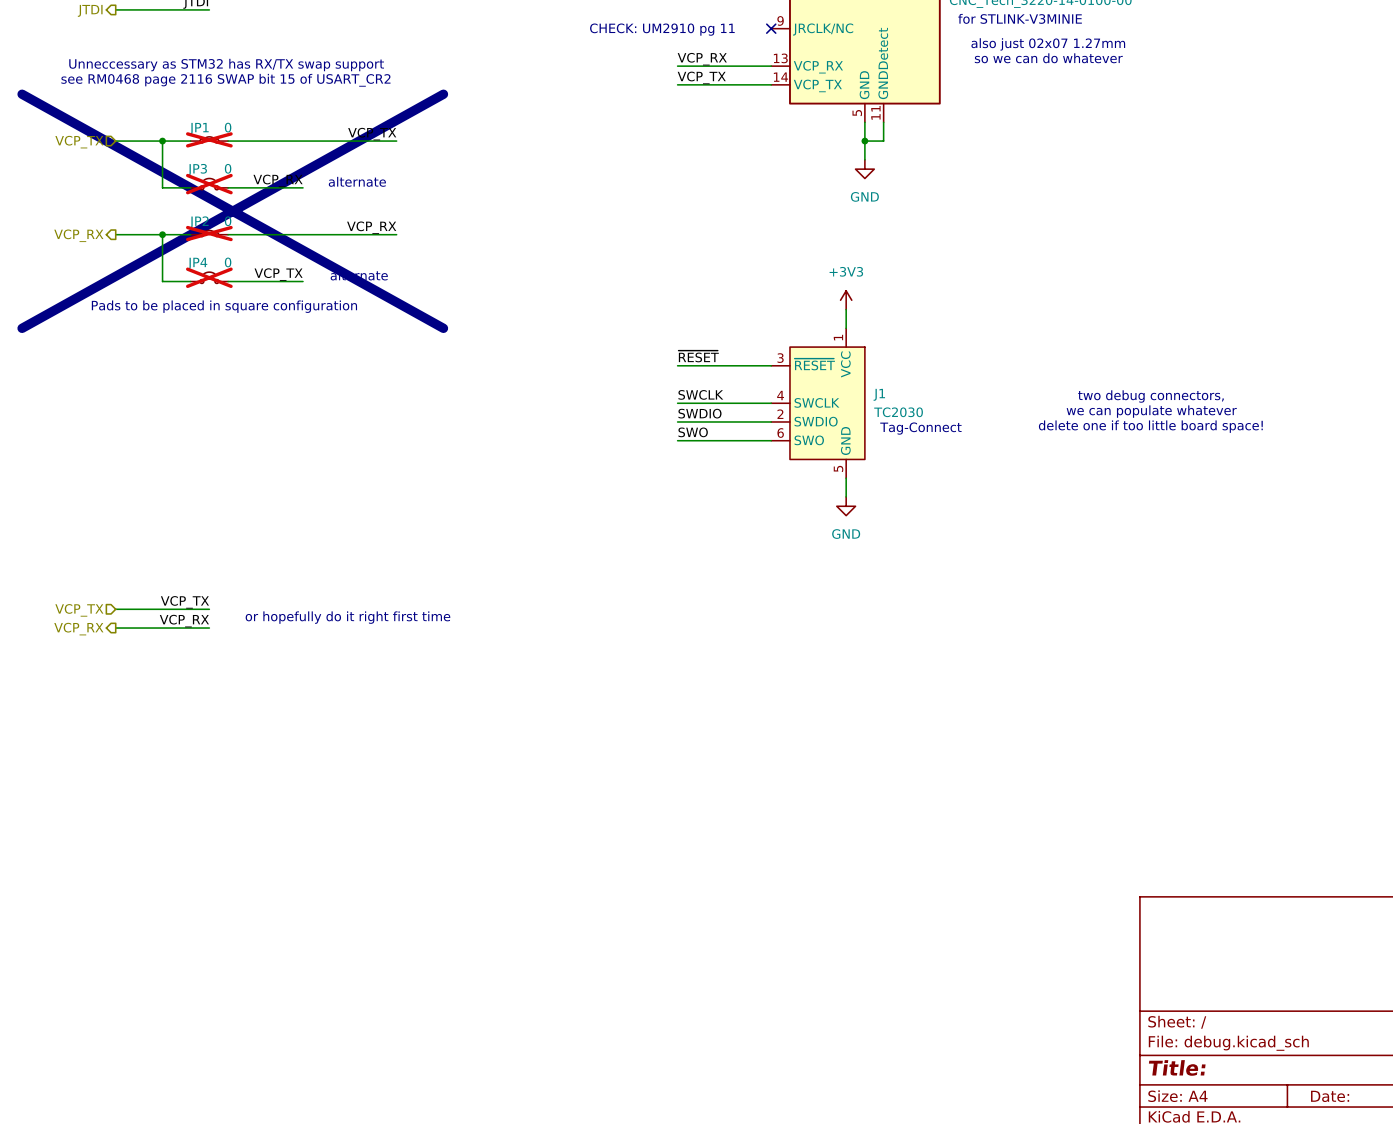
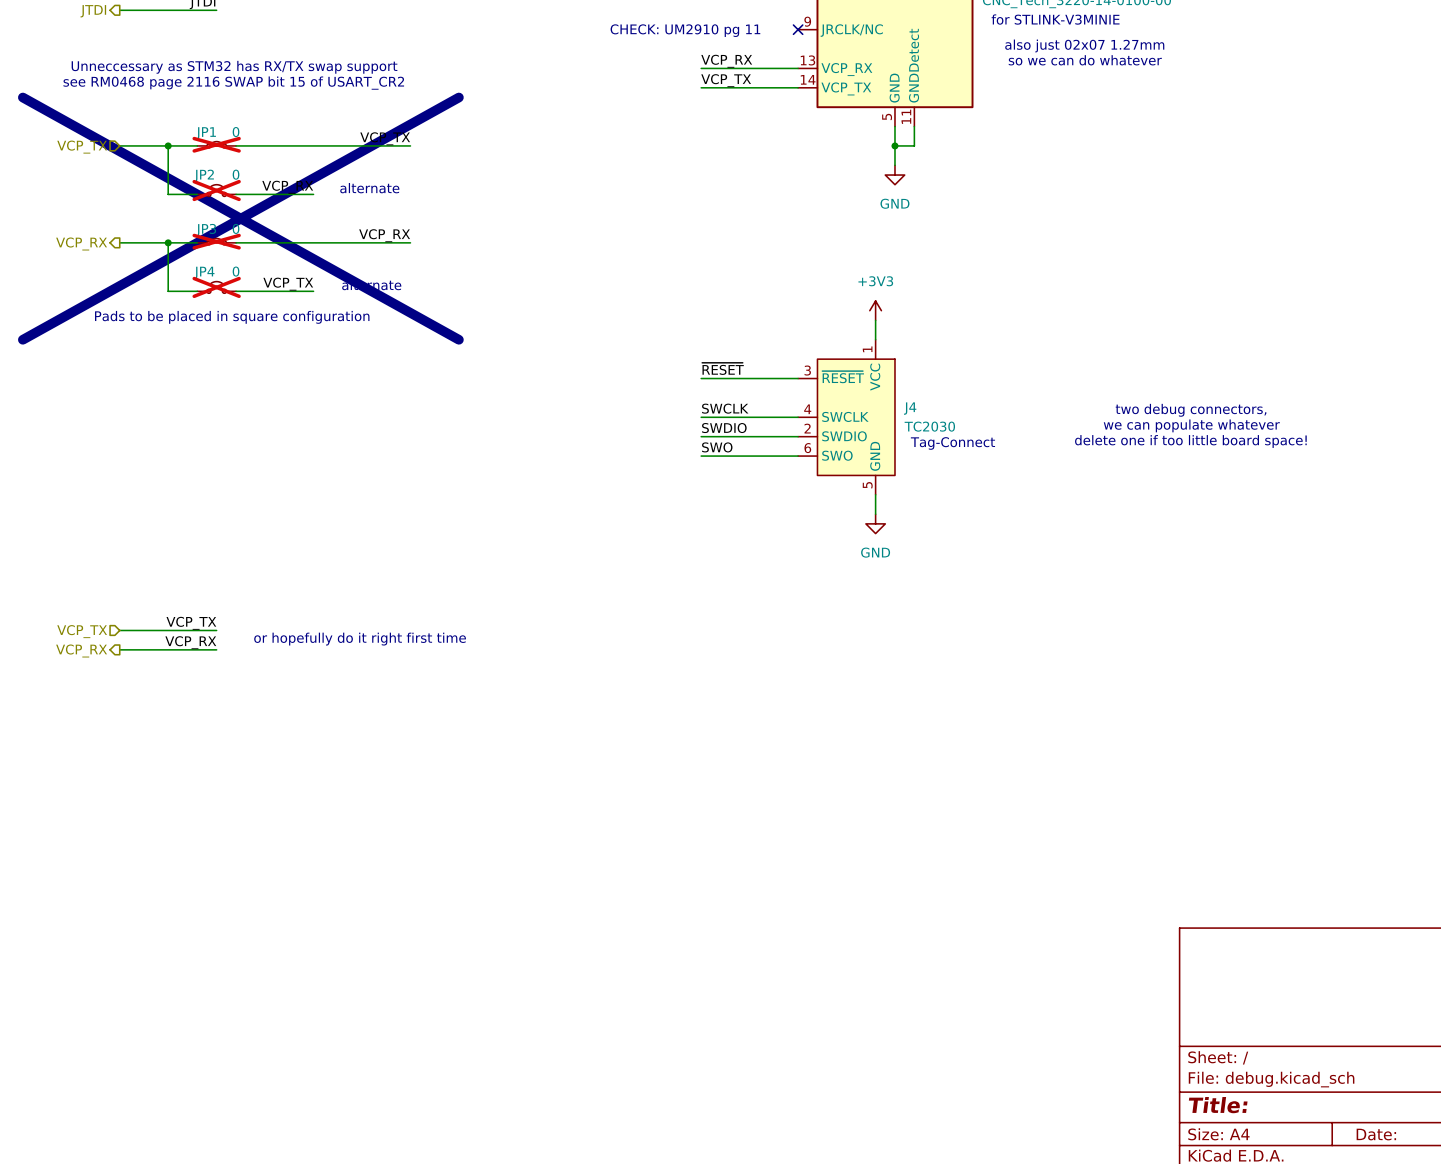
JP3 name: JP3 (197, 169) -> JP2 (204, 175)
JP2 name: JP2 (199, 222) -> JP3 (206, 230)
J1 name: J1 (879, 394) -> J4 (910, 408)

